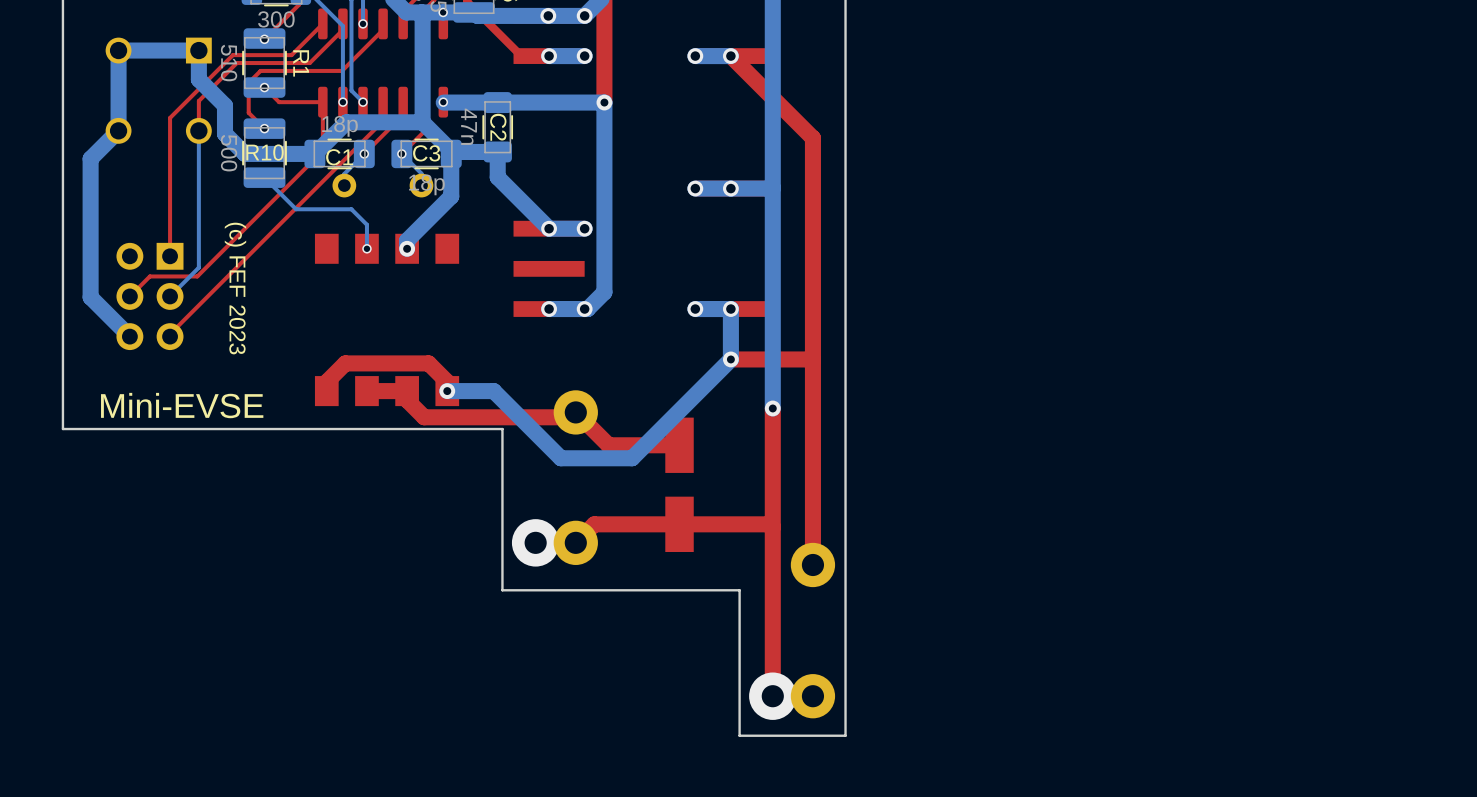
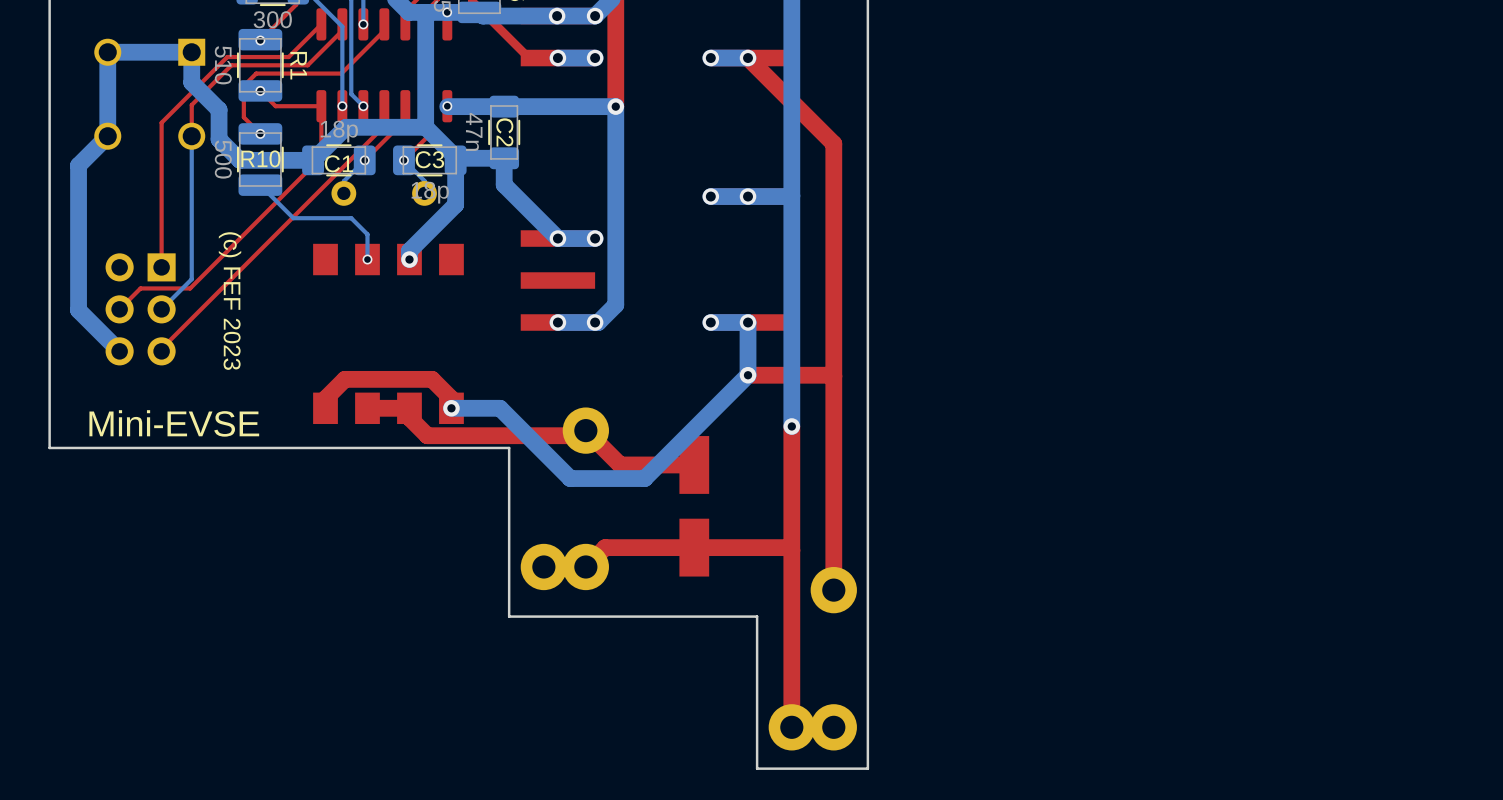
part: none -> (543, 566)
via: (535, 542) -> none
part: none -> (791, 727)
via: (772, 696) -> none

